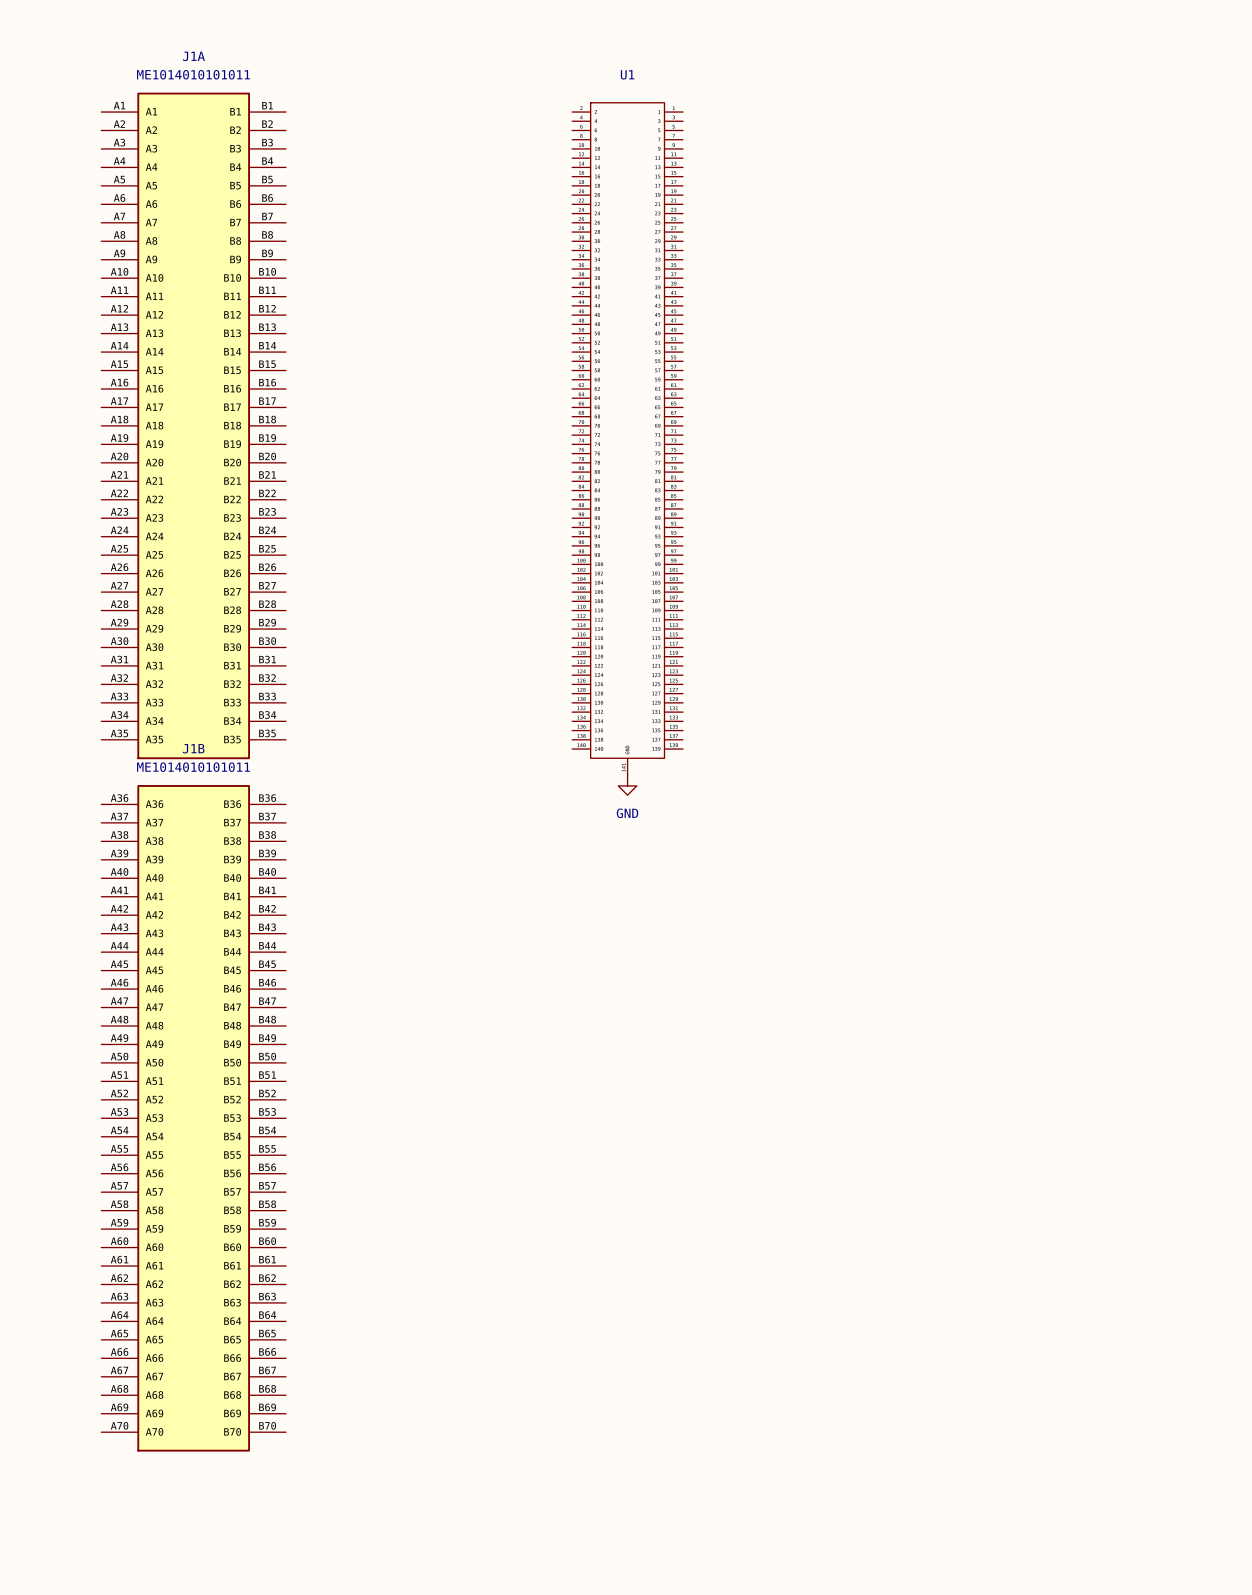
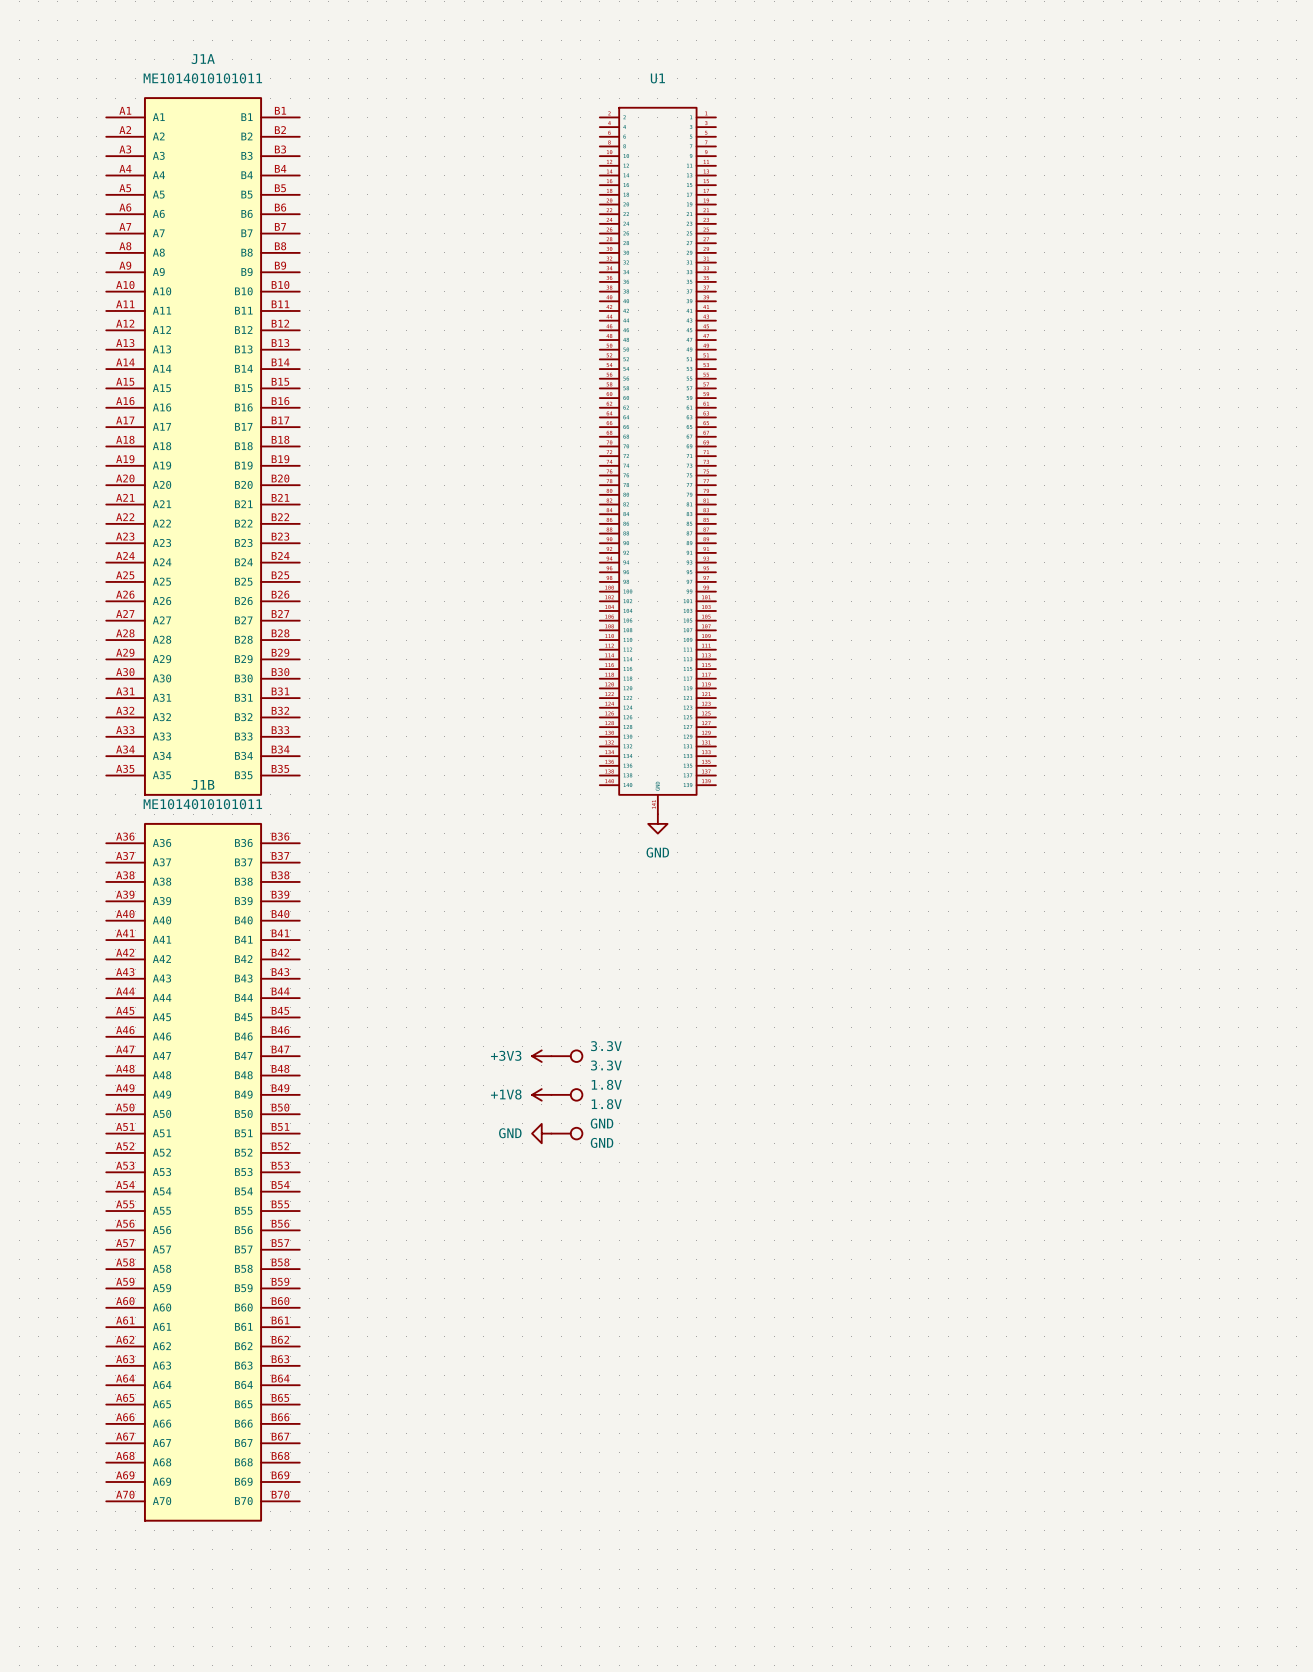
power symbol: none -> +3V3 (541, 1056)
3.3V: none -> 3.3V (566, 1056)
power symbol: none -> +1V8 (541, 1094)
1.8V: none -> 1.8V (566, 1094)
power symbol: none -> GND (541, 1133)
GND: none -> GND (566, 1133)

